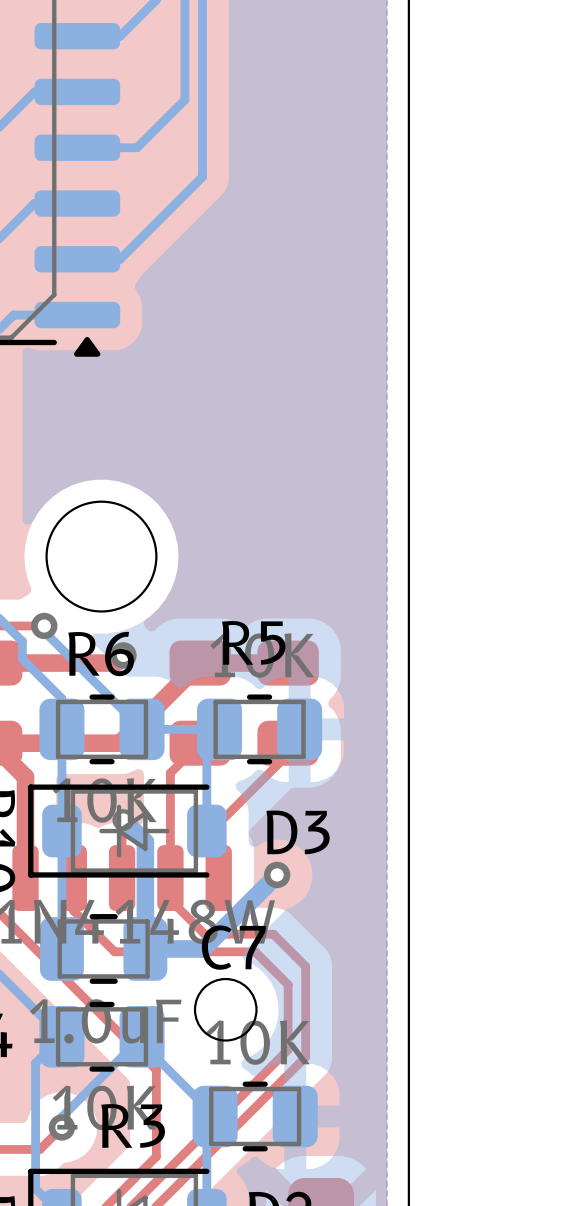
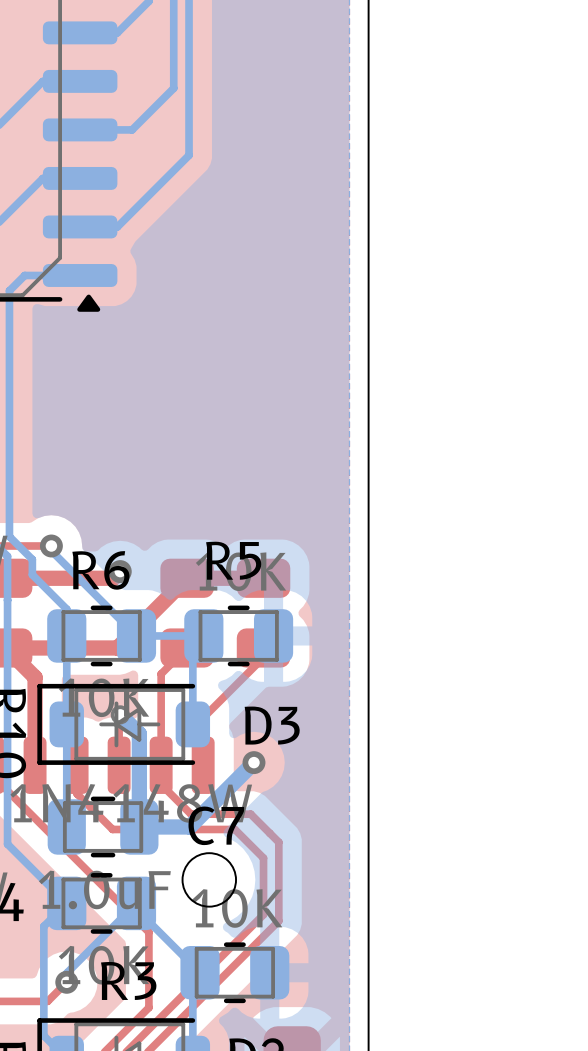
round board edge: [45, 500, 158, 613] -> none

